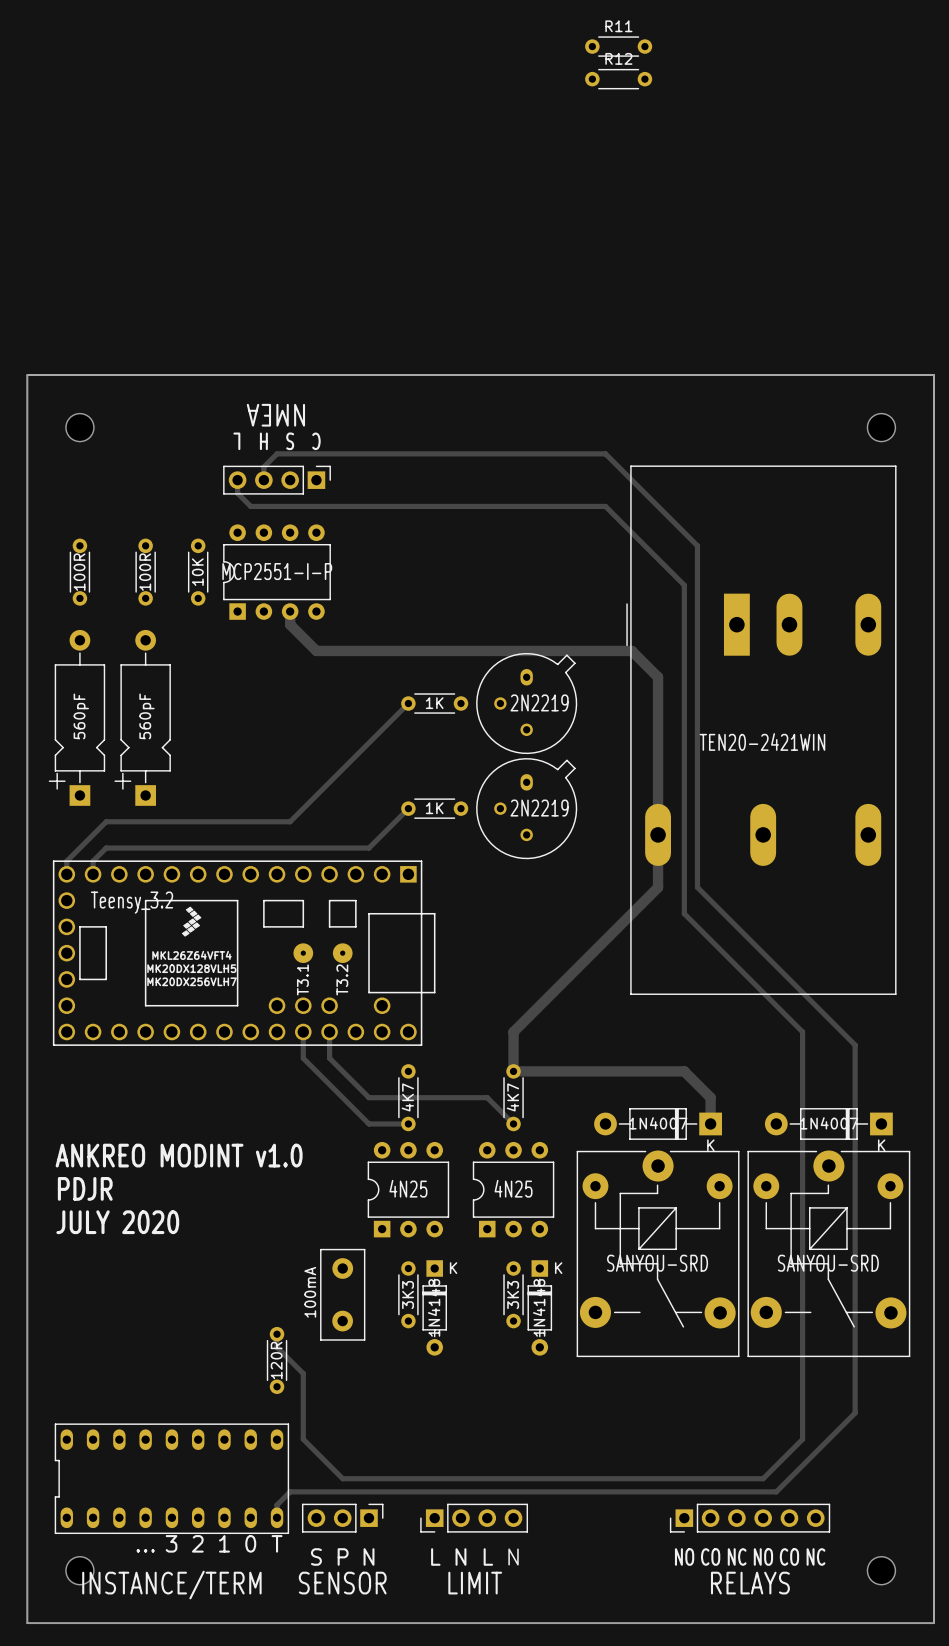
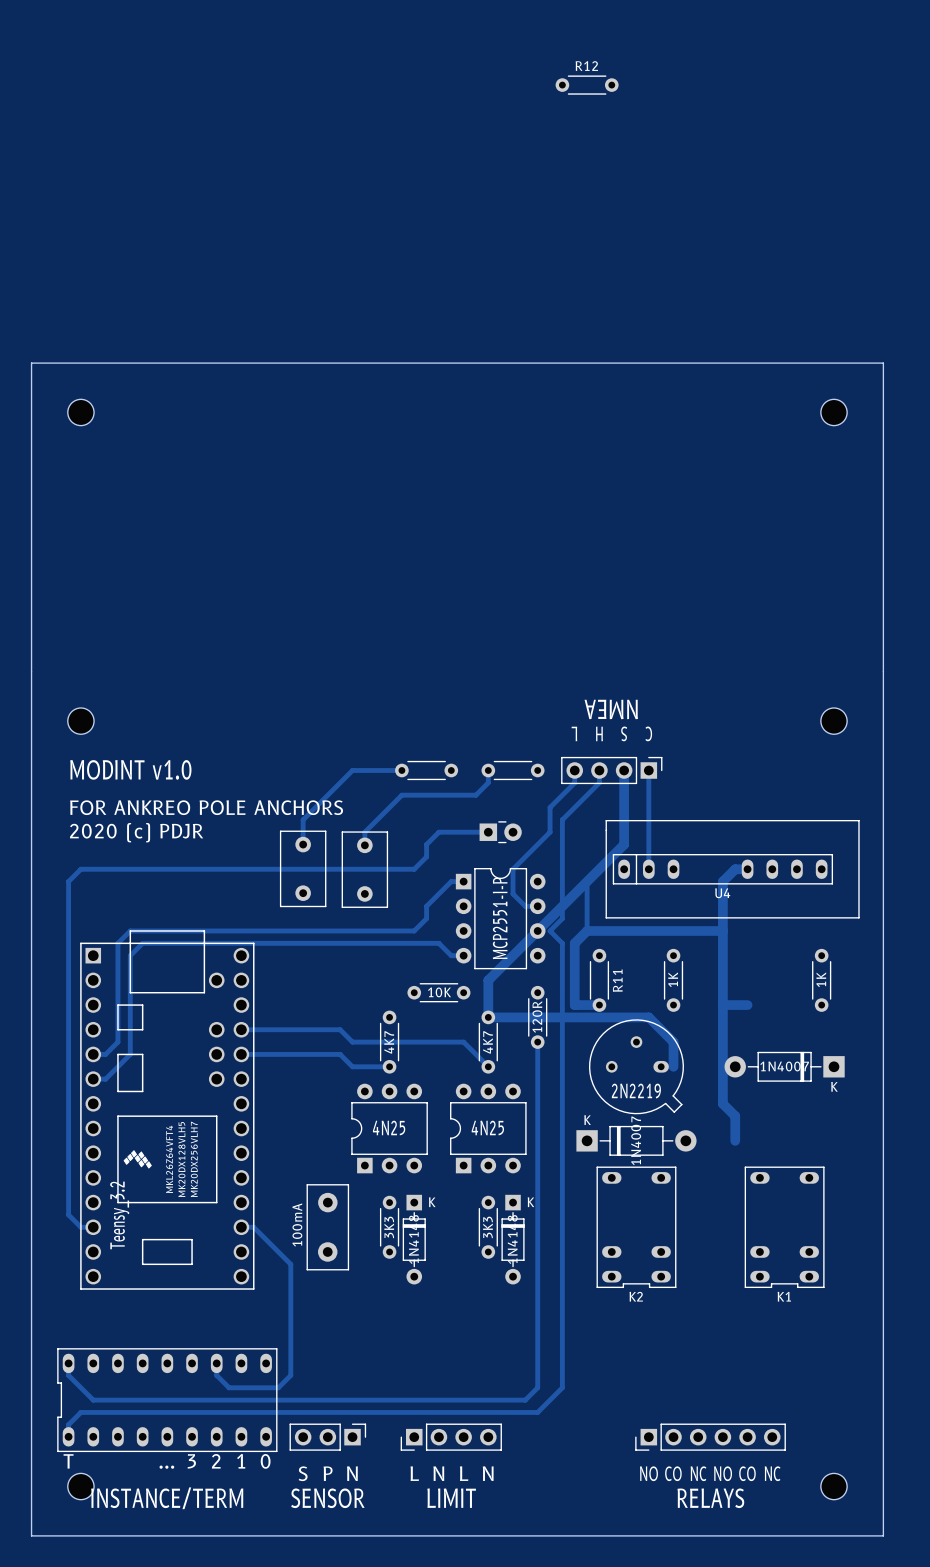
R11 rotation: 0° (618, 46) -> 90° clockwise (599, 980)
R11 position: (618, 46) -> (599, 980)
line: (27, 375) (27, 1623) (933, 1623) (933, 375) (27, 375) -> none
text: L (236, 441) -> none
text: H (263, 441) -> none
text: S (290, 441) -> none
text: C (316, 441) -> none
track: (237, 480) (237, 493) (250, 506) (605, 506) (684, 585) (684, 808) -> none
track: (263, 480) (263, 467) (277, 453) (605, 453) (697, 545) (697, 887) (855, 1045) (855, 1413) (776, 1491) (566, 1491) -> (599, 770) (599, 782) (562, 819) (562, 918) (550, 930) (562, 943) (562, 1387) (537, 1412)
part: NMEA (277, 480) -> none
part: 100R (79, 572) -> none
part: 100R (145, 572) -> none
part: 10K (198, 572) -> none
part: MCP2551-I-P (277, 572) -> none
track: (290, 611) (290, 624) (316, 650) (631, 650) (658, 677) (658, 808) -> none
track: (408, 703) (290, 821) (106, 821) (66, 861) (66, 874) -> none
part: 1K (434, 703) -> none
part: 2N2219 (526, 703) -> none
part: 560pF (76, 717) -> none
part: 560pF (142, 717) -> none
part: TEN20-2421WIN (761, 730) -> none
part: none -> (80, 721)
part: none -> (834, 721)
text: none -> L (574, 734)
text: none -> H (599, 734)
text: none -> S (624, 733)
text: none -> C (648, 733)
text: none -> MODINT v1.0 (130, 769)
track: (408, 808) (369, 848) (106, 848) (93, 861) (93, 874) -> none
track: none -> (401, 770) (352, 770) (303, 819) (303, 844)
part: 1K (434, 808) -> none
part: none -> (426, 770)
track: none -> (488, 770) (488, 782) (475, 795) (401, 795) (364, 832) (364, 845)
part: 2N2219 (526, 808) -> none
part: none -> (513, 770)
track: none -> (574, 770) (574, 782) (550, 807) (550, 832) (513, 869) (513, 893) (525, 906) (537, 906)
part: none -> NMEA (611, 770)
text: none -> FOR ANKREO POLE ANCHORS (206, 807)
text: none -> 2020 (c) PDJR (136, 832)
track: none -> (488, 832) (438, 832) (426, 844) (426, 856) (414, 869) (80, 869) (68, 881) (68, 1214) (80, 1227) (93, 1227)
part: none -> (500, 832)
part: none -> (303, 868)
track: (684, 913) (802, 1032) (802, 1439) (763, 1478) (552, 1478) -> (537, 1042) (537, 1387) (525, 1400)
U4: none -> (732, 869)
track: none -> (747, 869) (735, 869) (722, 881) (722, 1103) (735, 1116) (735, 1140)
part: none -> (364, 869)
track: none -> (463, 881) (451, 881) (426, 906) (426, 918) (414, 930) (130, 930) (117, 943) (117, 1042) (105, 1054) (93, 1054)
track: none -> (587, 881) (587, 930)
part: Teensy_3.2 (244, 953) -> none
part: none -> MCP2551-I-P (500, 918)
track: none -> (587, 930) (574, 943) (574, 1005) (599, 1005)
track: none -> (587, 930) (722, 930)
track: none -> (463, 955) (451, 955) (438, 943) (142, 943) (130, 955) (130, 1054) (105, 1079) (93, 1079)
track: (303, 1032) (303, 1058) (355, 1110) -> (241, 1054) (340, 1054)
track: (329, 1032) (329, 1058) (355, 1084) -> (241, 1029) (340, 1029)
part: none -> 1K (673, 980)
part: none -> 1K (821, 980)
part: none -> 10K (438, 992)
track: none -> (722, 1005) (747, 1005)
part: none -> 120R (537, 1017)
part rotation: 0° (658, 1123) -> 180° (636, 1140)
part position: (658, 1123) -> (636, 1140)
part: none -> 2N2219 (636, 1066)
text: ANKREO MODINT v1.0 (179, 1155) -> none
part: none -> Teensy_3.2 (167, 1110)
text: PDJR (85, 1188) -> none
text: JULY 2020 (117, 1222) -> none
part: SANYOU-SRD (658, 1253) -> none
part: SANYOU-SRD (828, 1253) -> none
K2: none -> (636, 1227)
K1: none -> (784, 1227)
track: (277, 1334) (277, 1347) (303, 1373) -> (241, 1227) (253, 1227) (290, 1264) (290, 1301)
part: 120R (277, 1360) -> none
track: none -> (68, 1363) (68, 1375) (93, 1400) (327, 1400)
track: (303, 1439) (342, 1478) -> (290, 1363) (290, 1375) (278, 1387) (229, 1387) (216, 1375) (216, 1363)
track: (290, 1491) (277, 1505) (277, 1517) -> (278, 1412) (80, 1412) (68, 1424) (68, 1436)
text: none -> T (68, 1461)
text: 3 (171, 1543) -> ... (166, 1467)
text: 2 (197, 1543) -> 3 (191, 1461)
text: 1 (224, 1543) -> 2 (216, 1461)
text: 0 (250, 1543) -> 1 (241, 1461)
text: T (277, 1543) -> 0 (265, 1461)
text: ... (145, 1550) -> none

